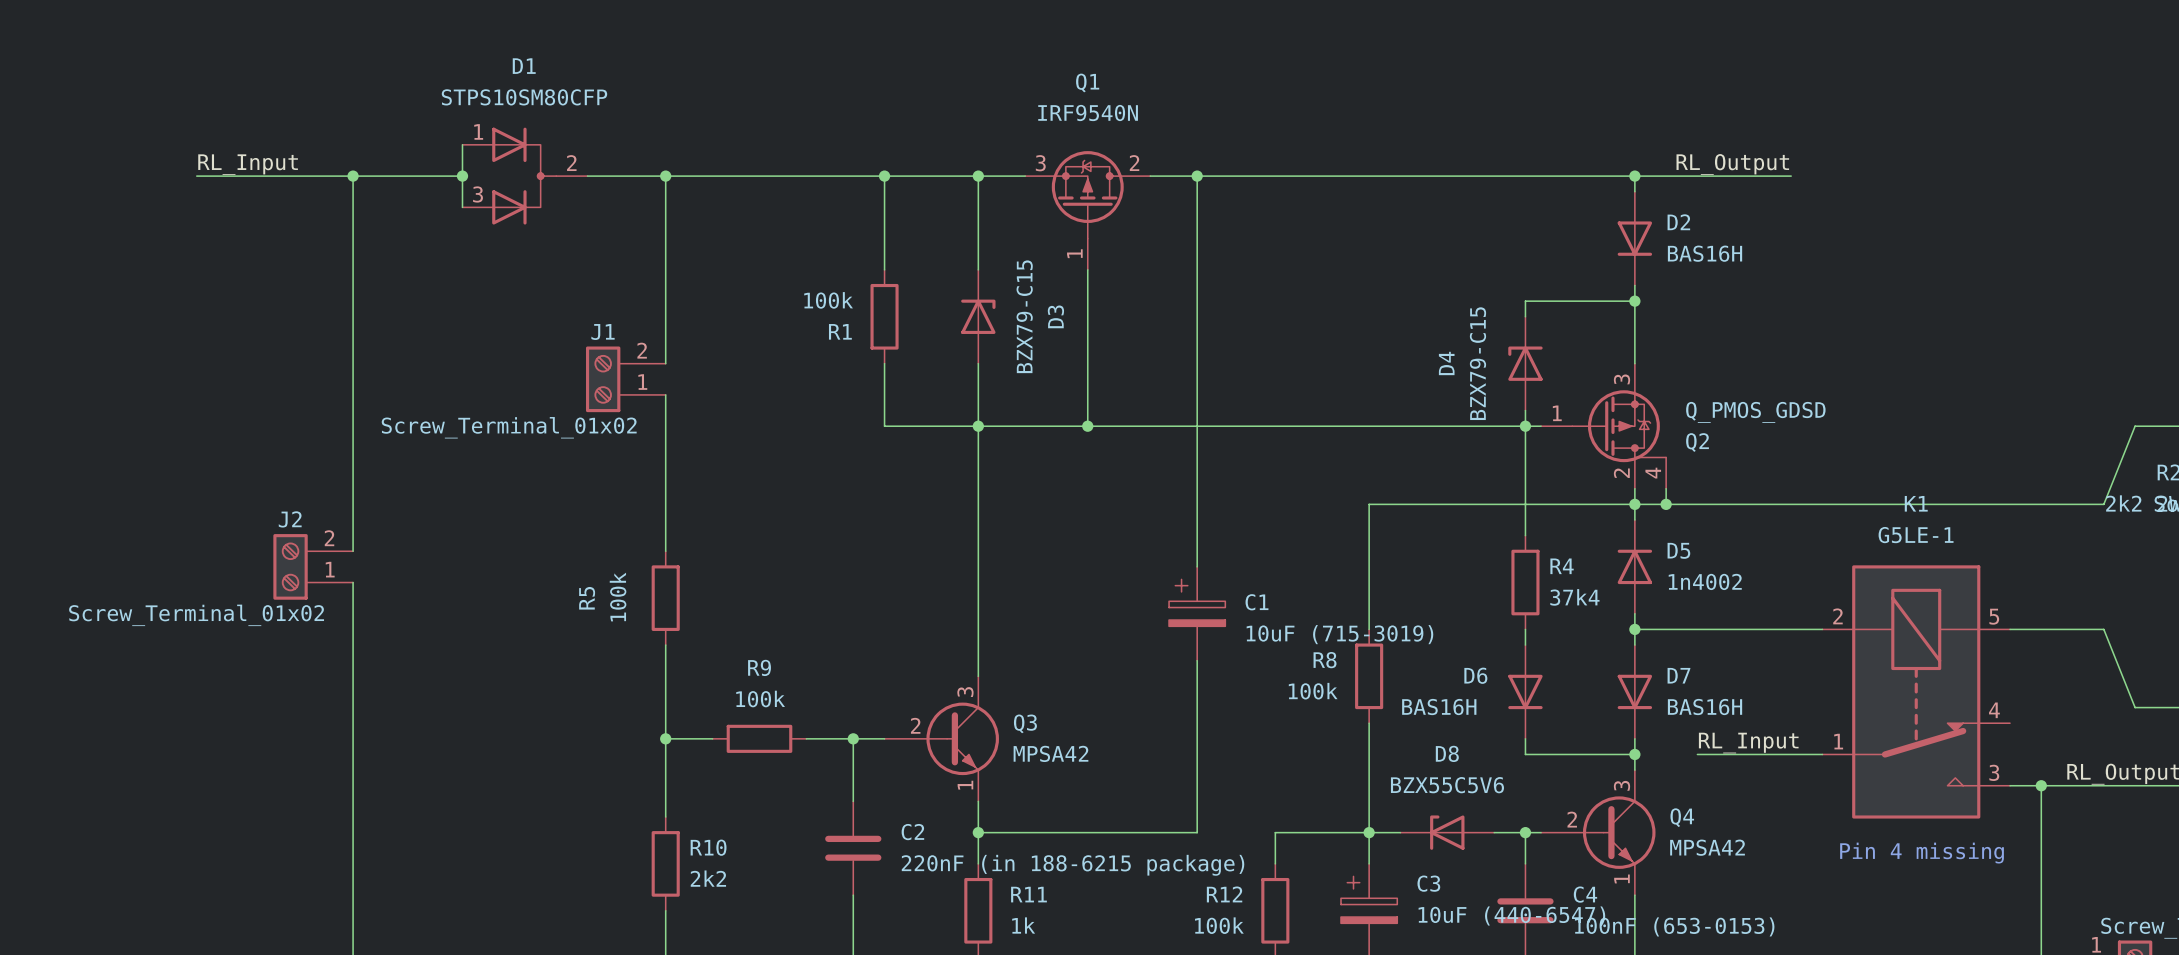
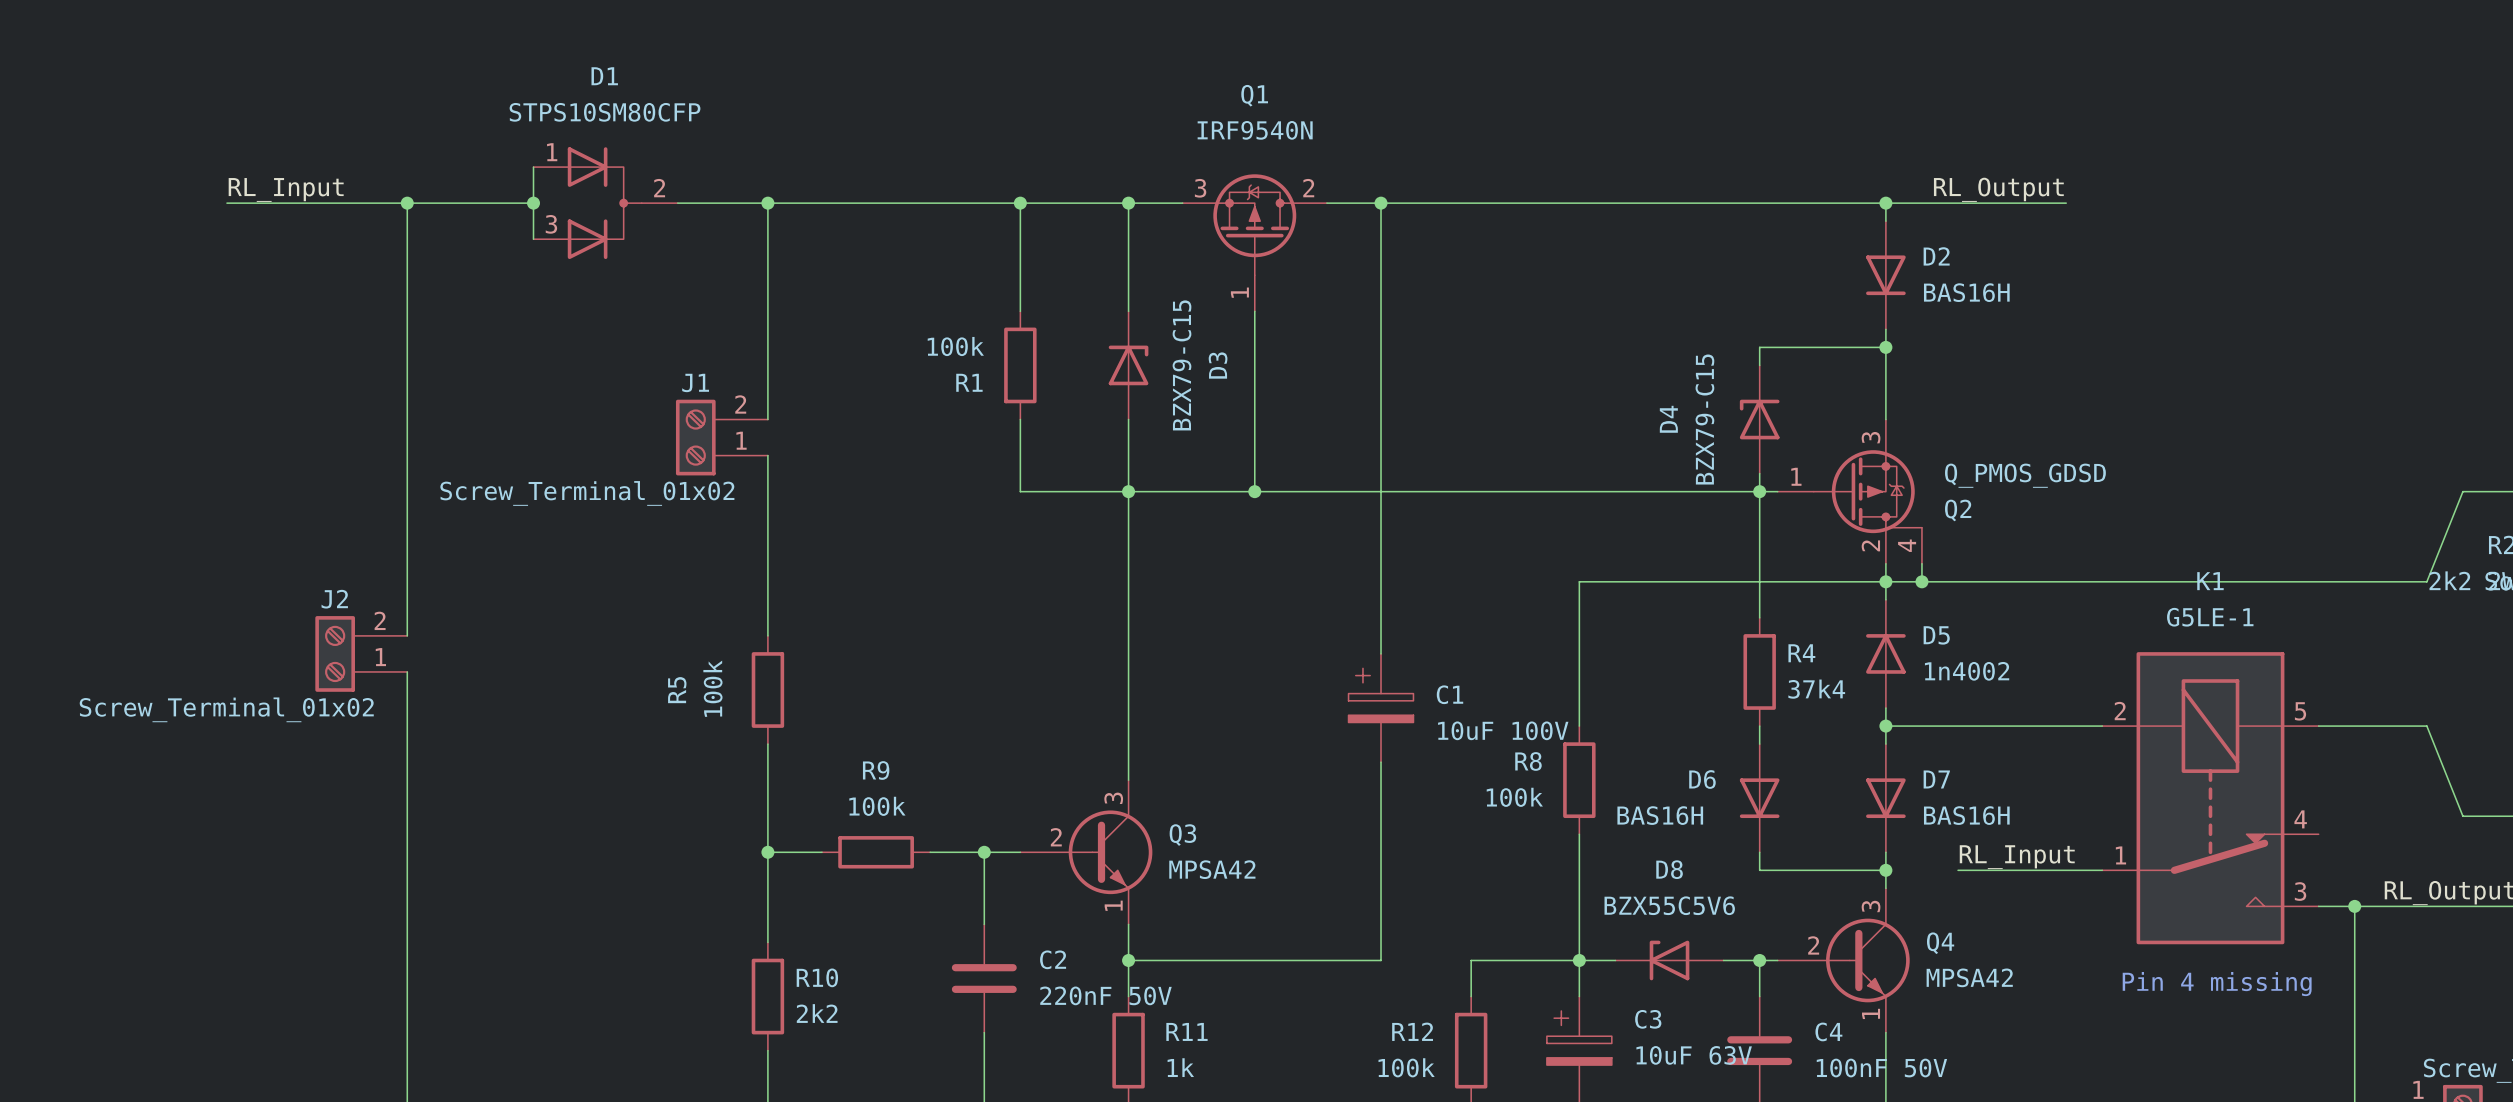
C1 value: 10uF (715-3019) (1339, 634) -> 10uF 100V (1503, 730)
C2 value: 220nF (in 188-6215 package) (1073, 865) -> 220nF 50V (1105, 995)
C3 value: 10uF (440-6547) (1511, 915) -> 10uF 63V (1694, 1055)
C4 value: 100nF (653-0153) (1674, 926) -> 100nF 50V (1881, 1068)

